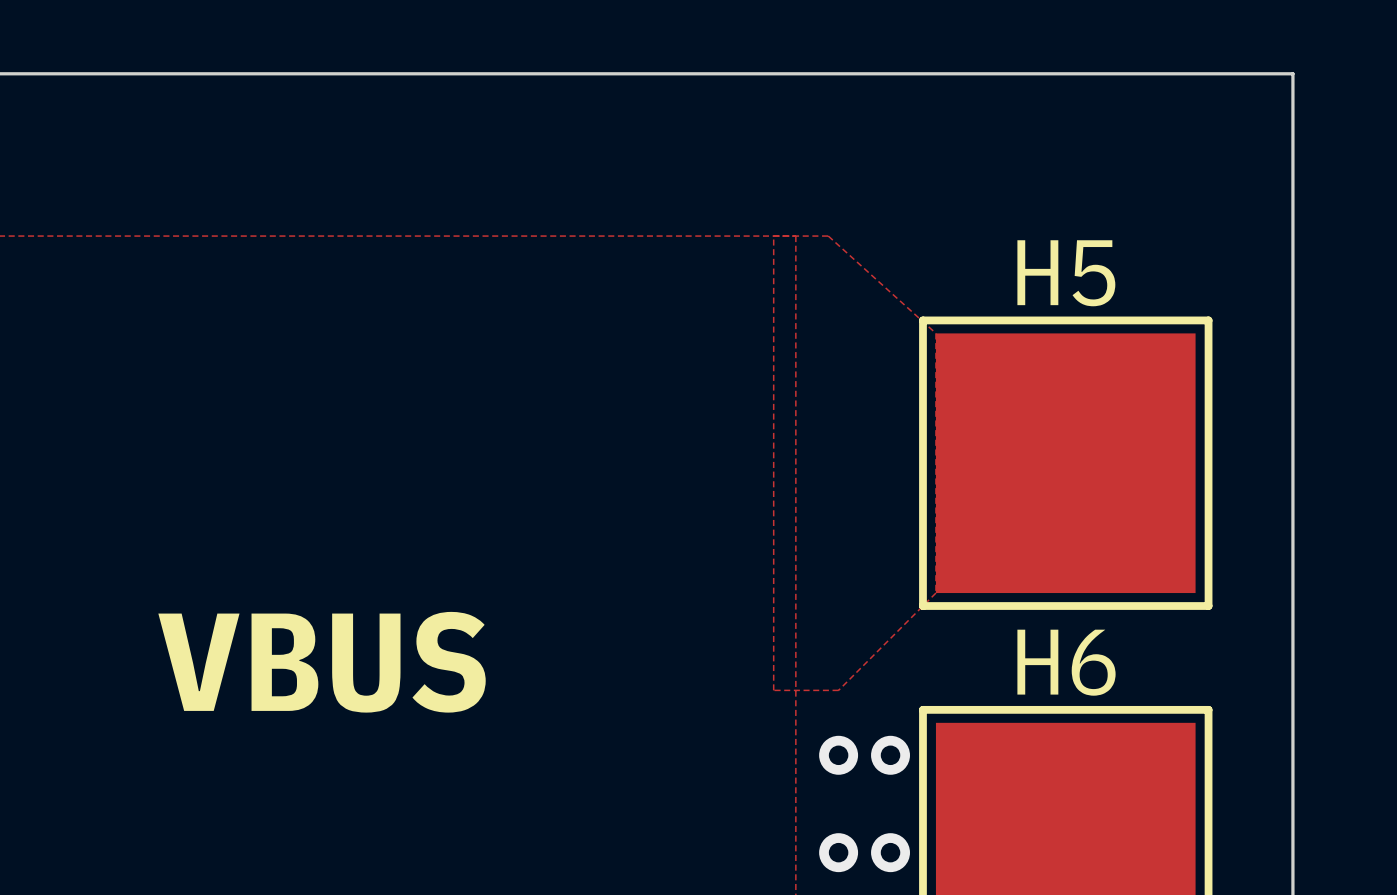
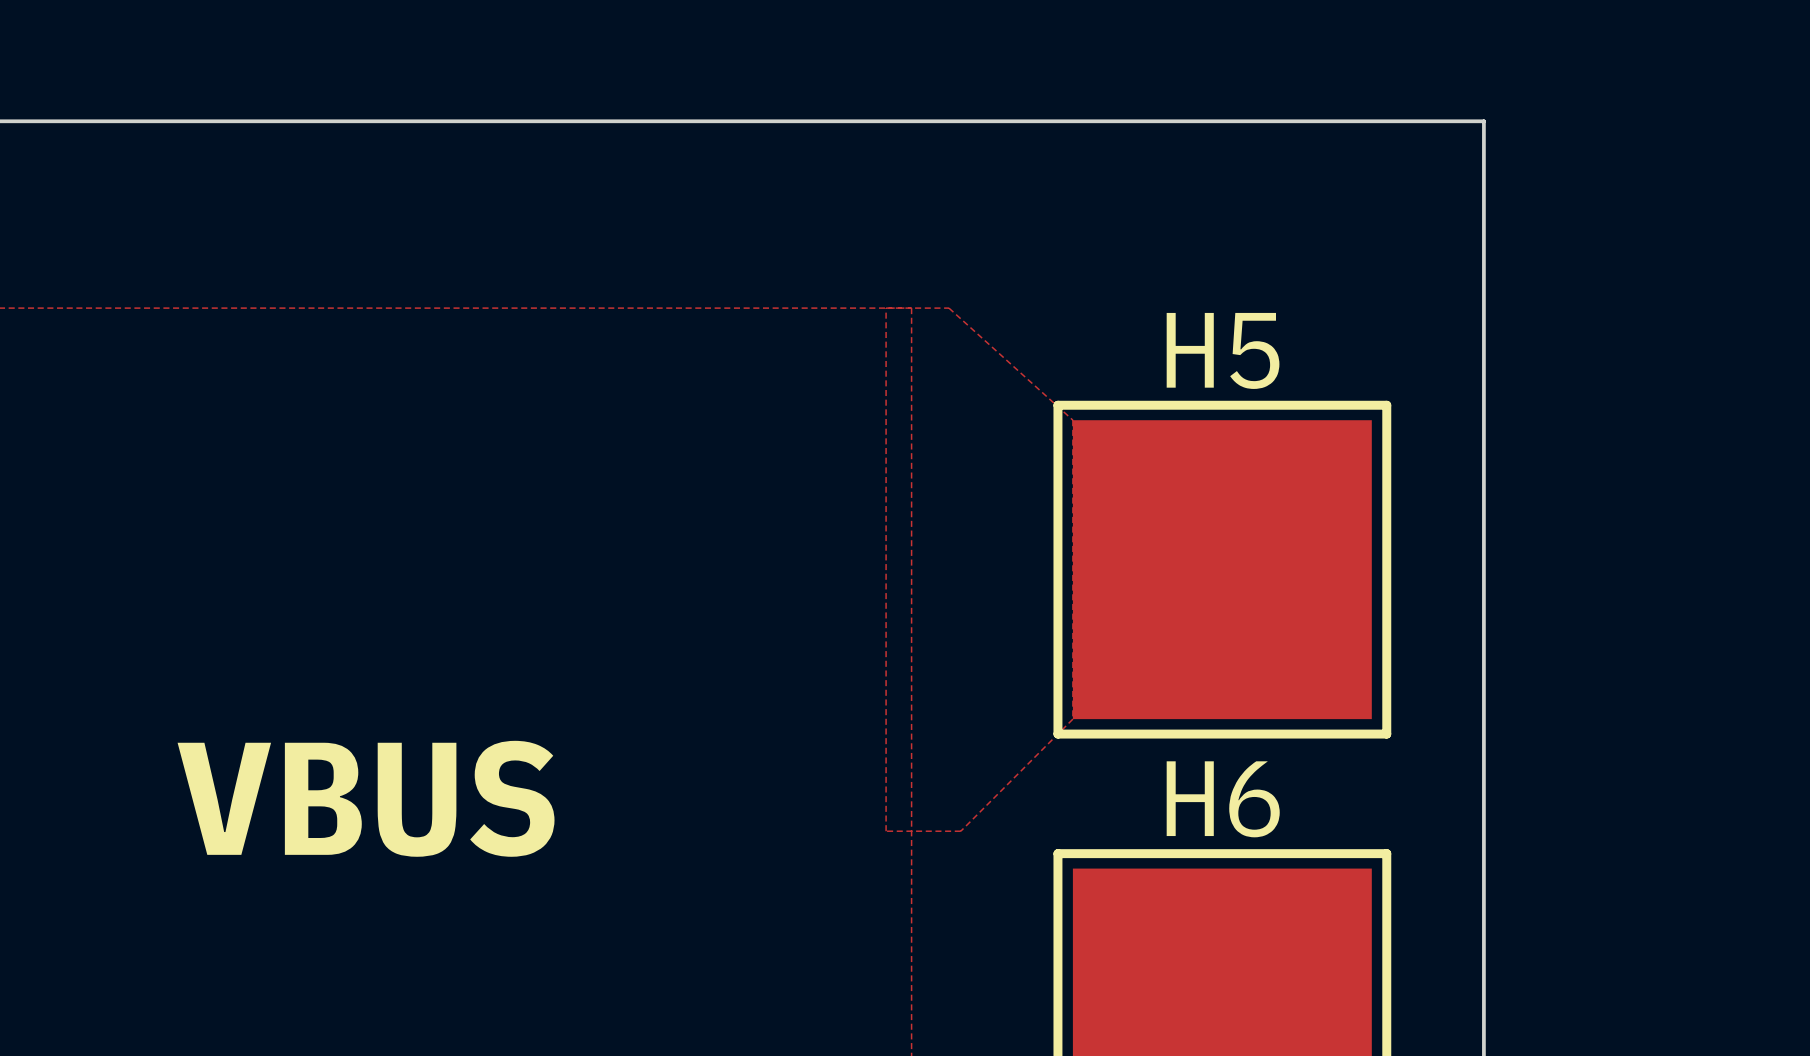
via: (838, 755) -> none
via: (890, 755) -> none
via: (838, 852) -> none
via: (890, 852) -> none

